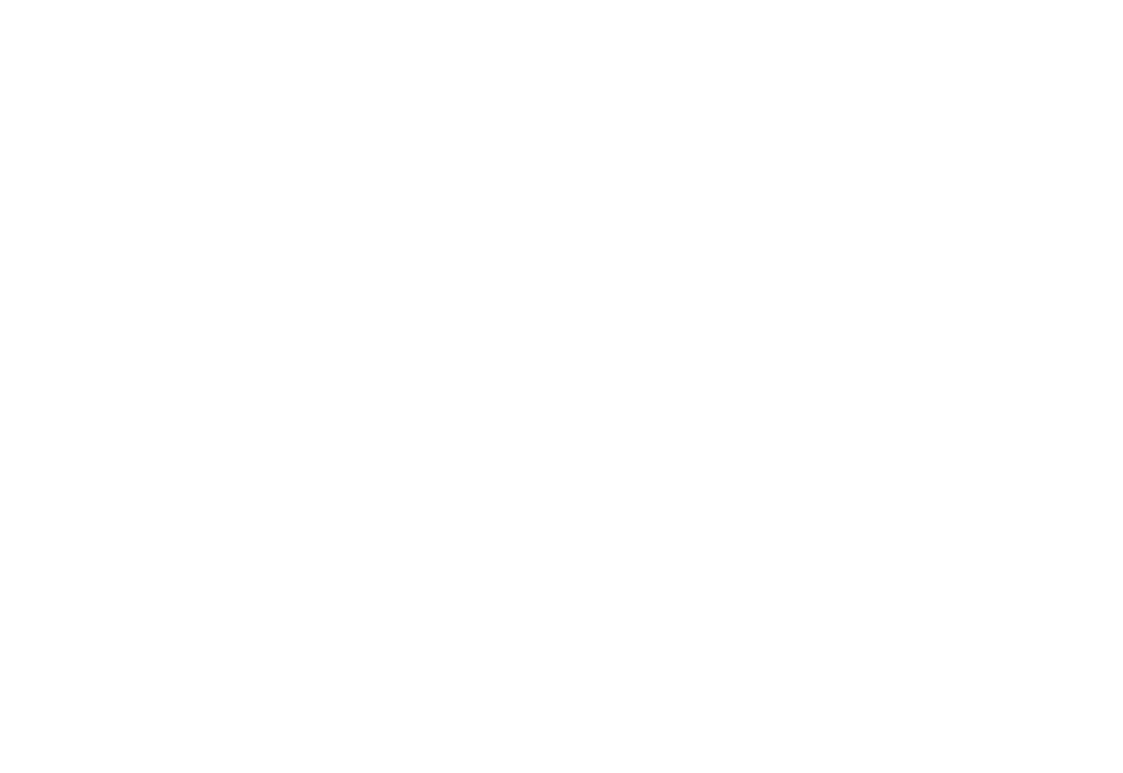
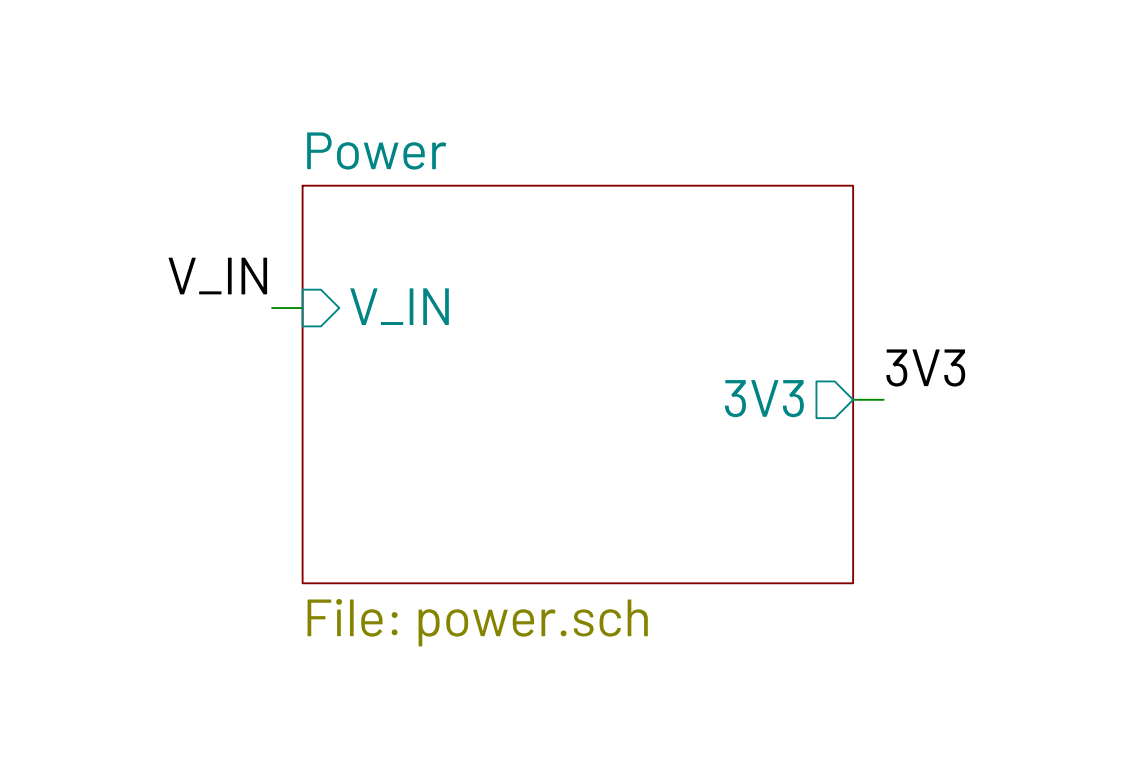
label: none -> V_IN (217, 276)
wire: none -> (272, 308) (302, 308)
sheet pin: none -> V_IN (399, 306)
label: none -> 3V3 (925, 367)
sheet Power: none -> File: power.sch (577, 384)
sheet pin: none -> 3V3 (764, 398)
wire: none -> (853, 399) (883, 399)

